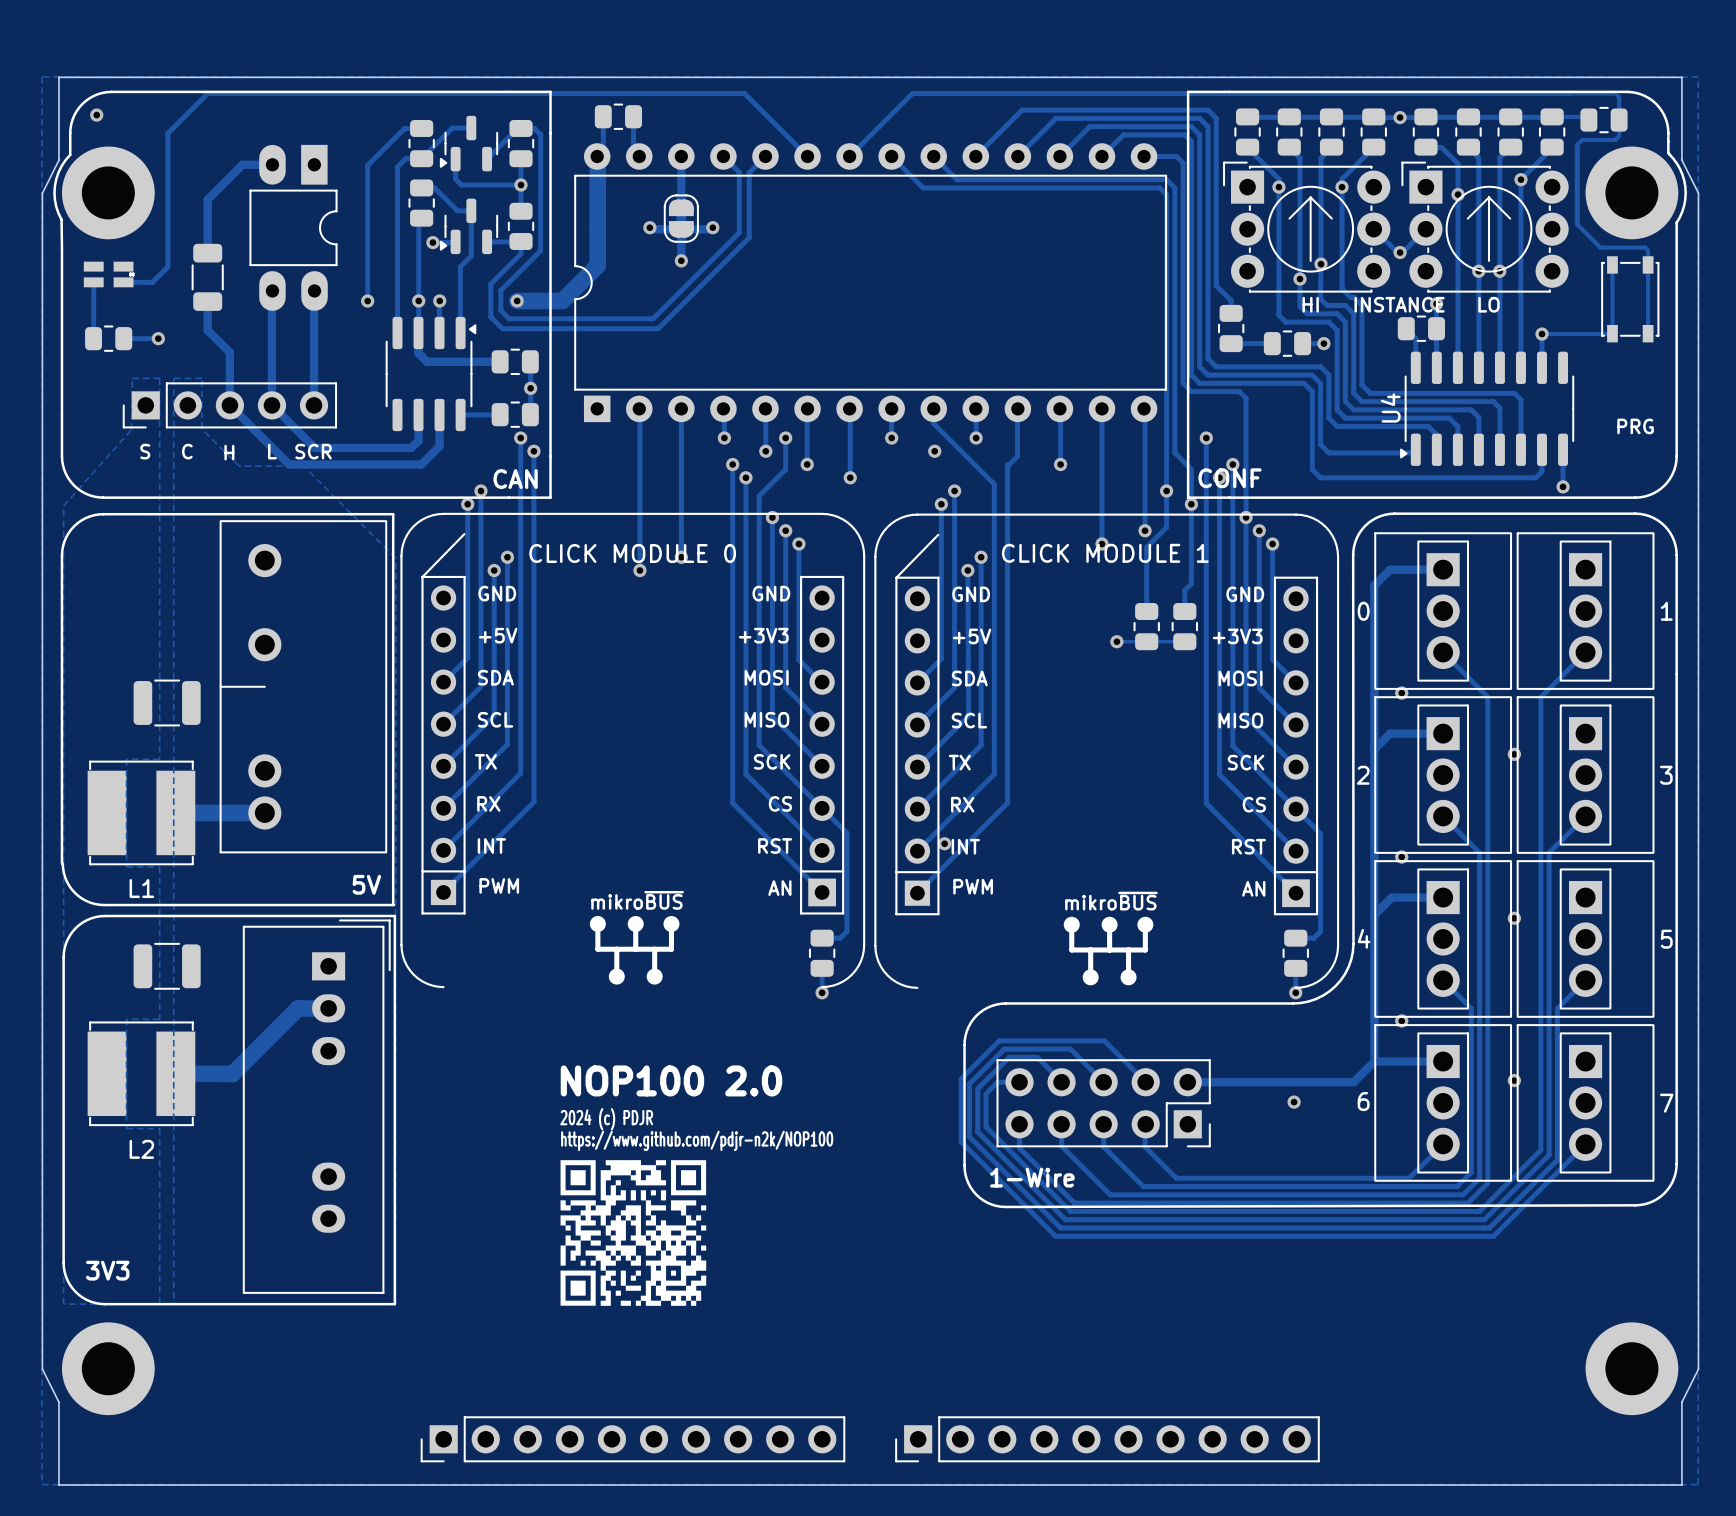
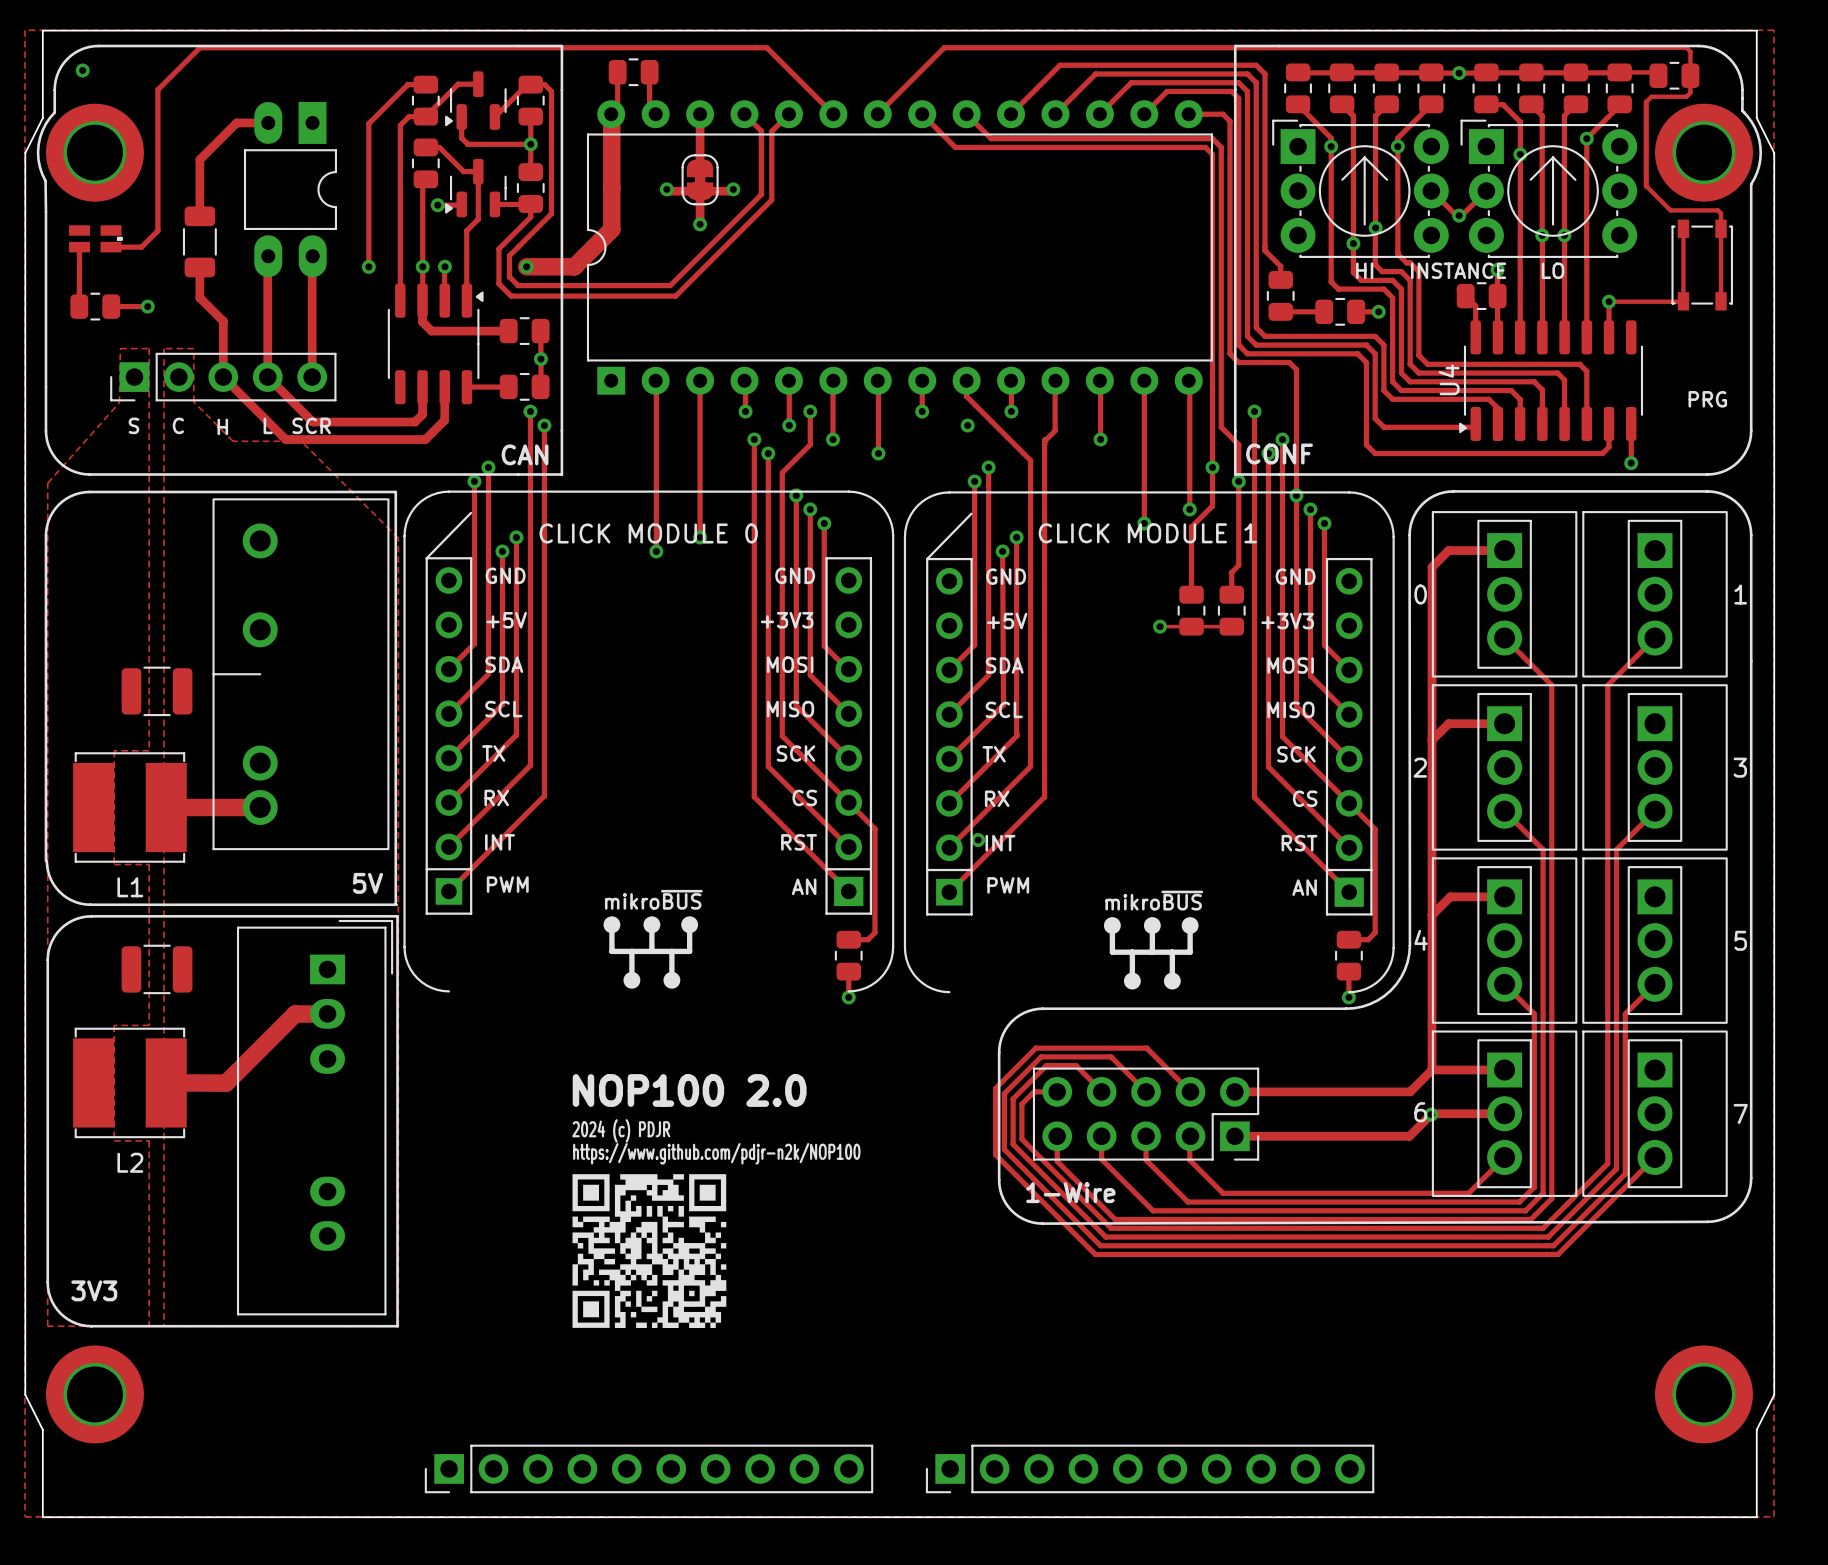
via: (1401, 693) -> none
via: (1514, 754) -> none
via: (1401, 857) -> none
via: (1514, 918) -> none
via: (1401, 1020) -> none
via: (1514, 1080) -> none
via: (1294, 1102) -> none
track: none -> (1504, 1113) (1432, 1113) (1409, 1136) (1234, 1136)
via: none -> (1431, 1114)

